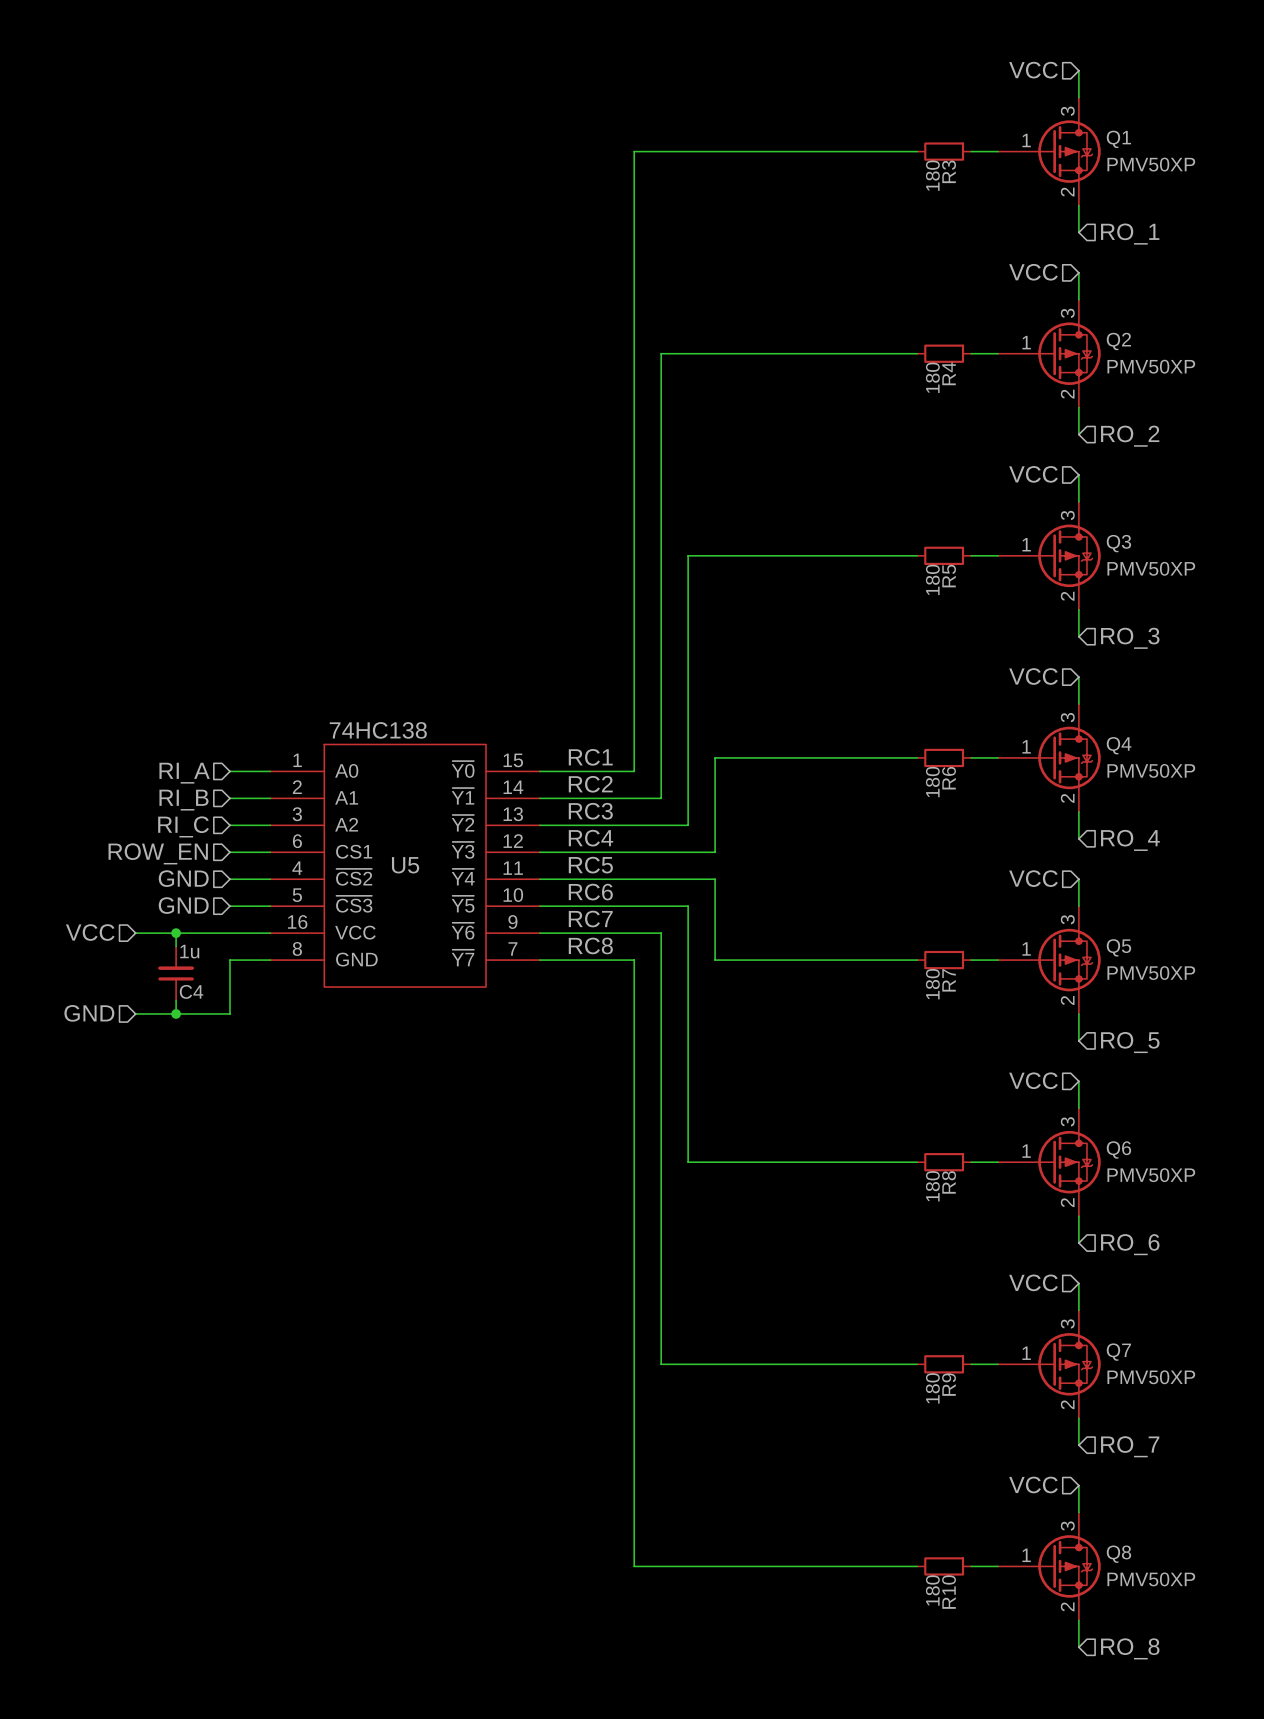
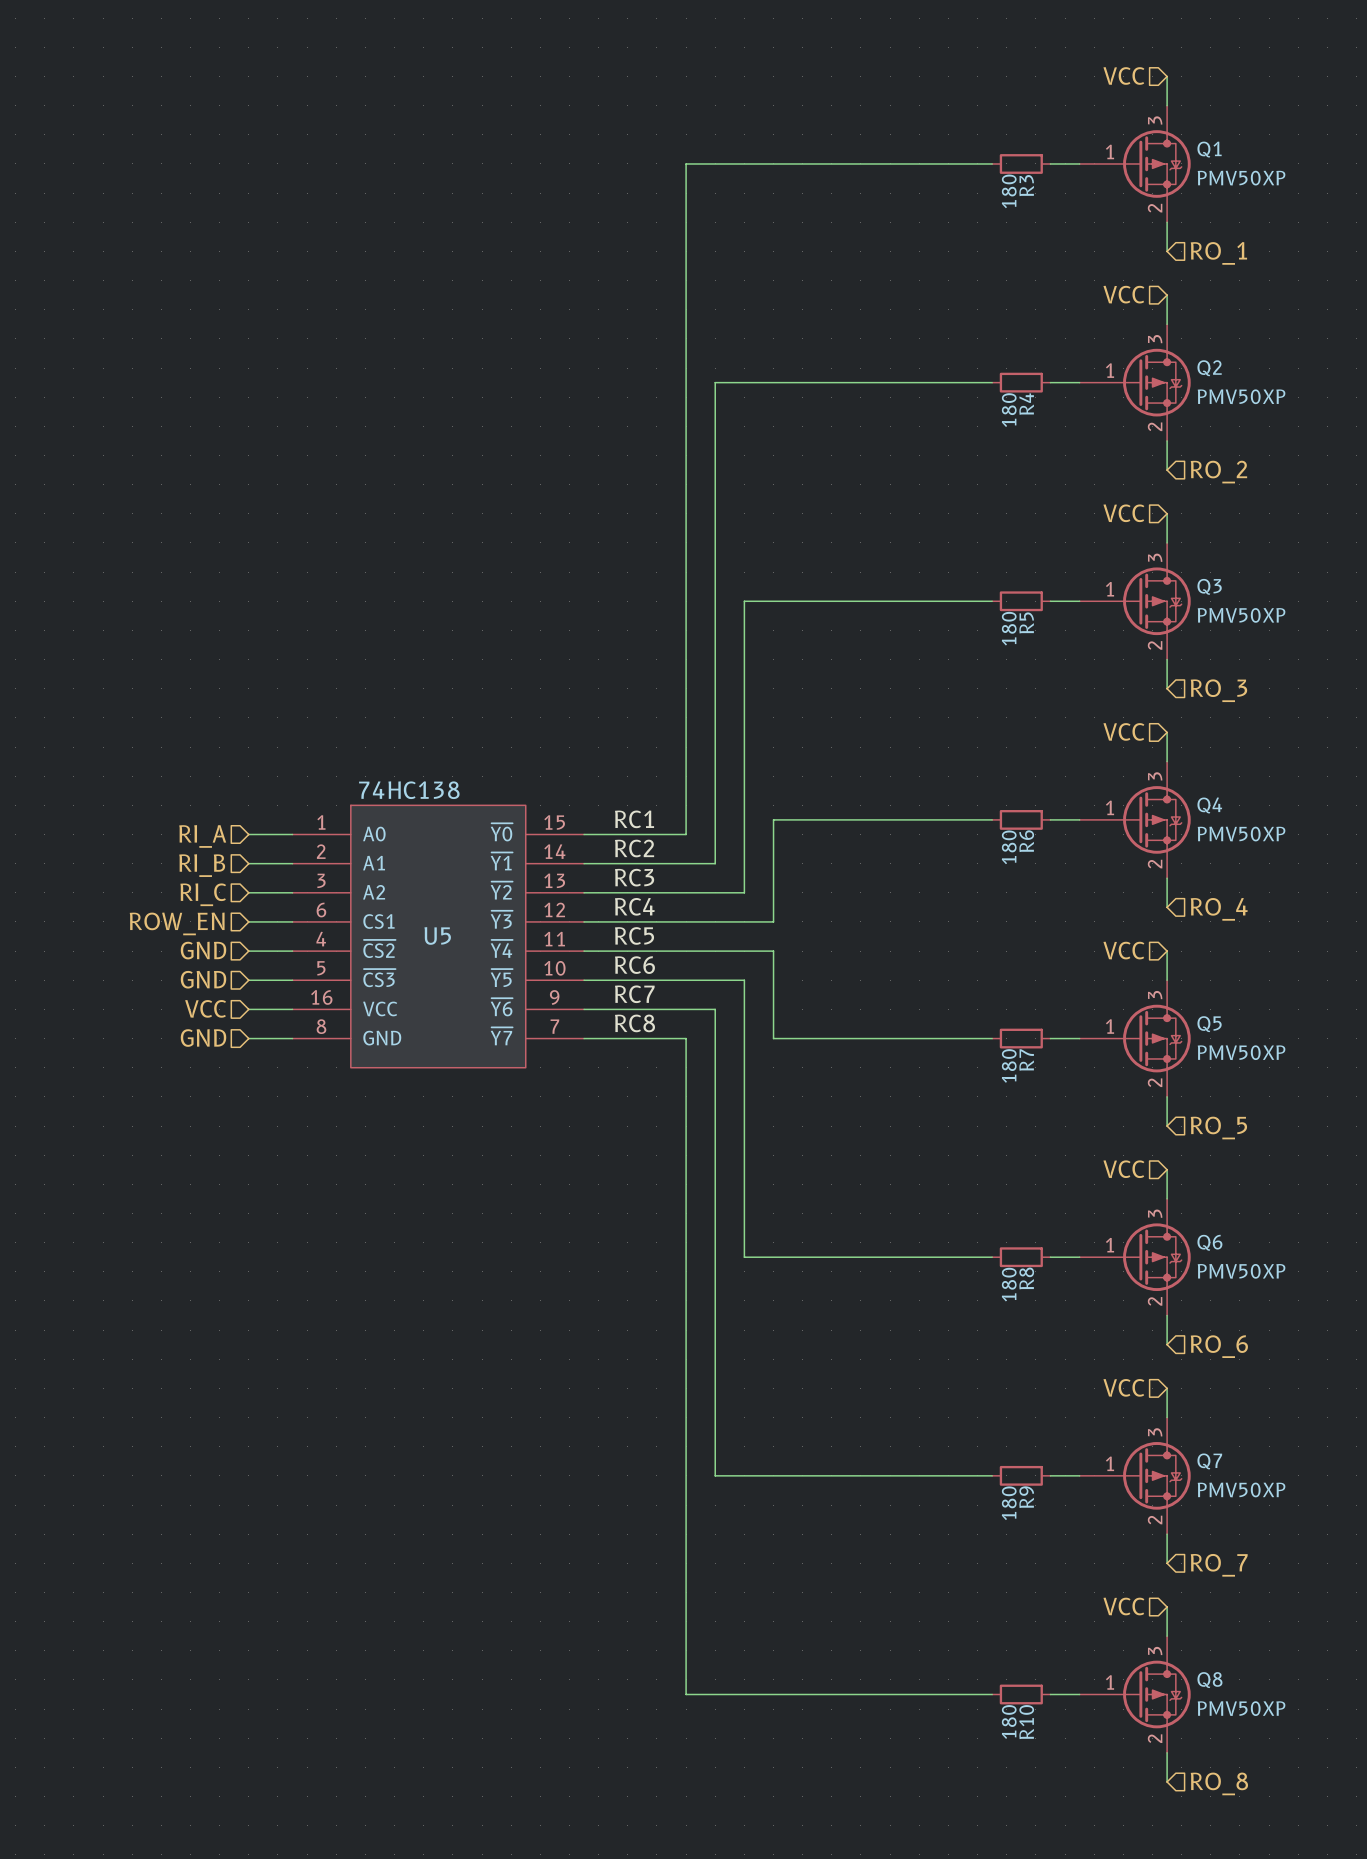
hierarchical label position: VCC (90, 932) -> VCC (205, 1008)
wire: (135, 933) (229, 933) -> none
wire: (176, 933) (176, 946) -> none
junction: (176, 933) -> none
wire: (229, 960) (229, 1013) (135, 1013) -> none
C4: 1u (176, 973) -> none
wire: (176, 1000) (176, 1013) -> none
hierarchical label position: GND (89, 1013) -> GND (203, 1038)
junction: (176, 1013) -> none

